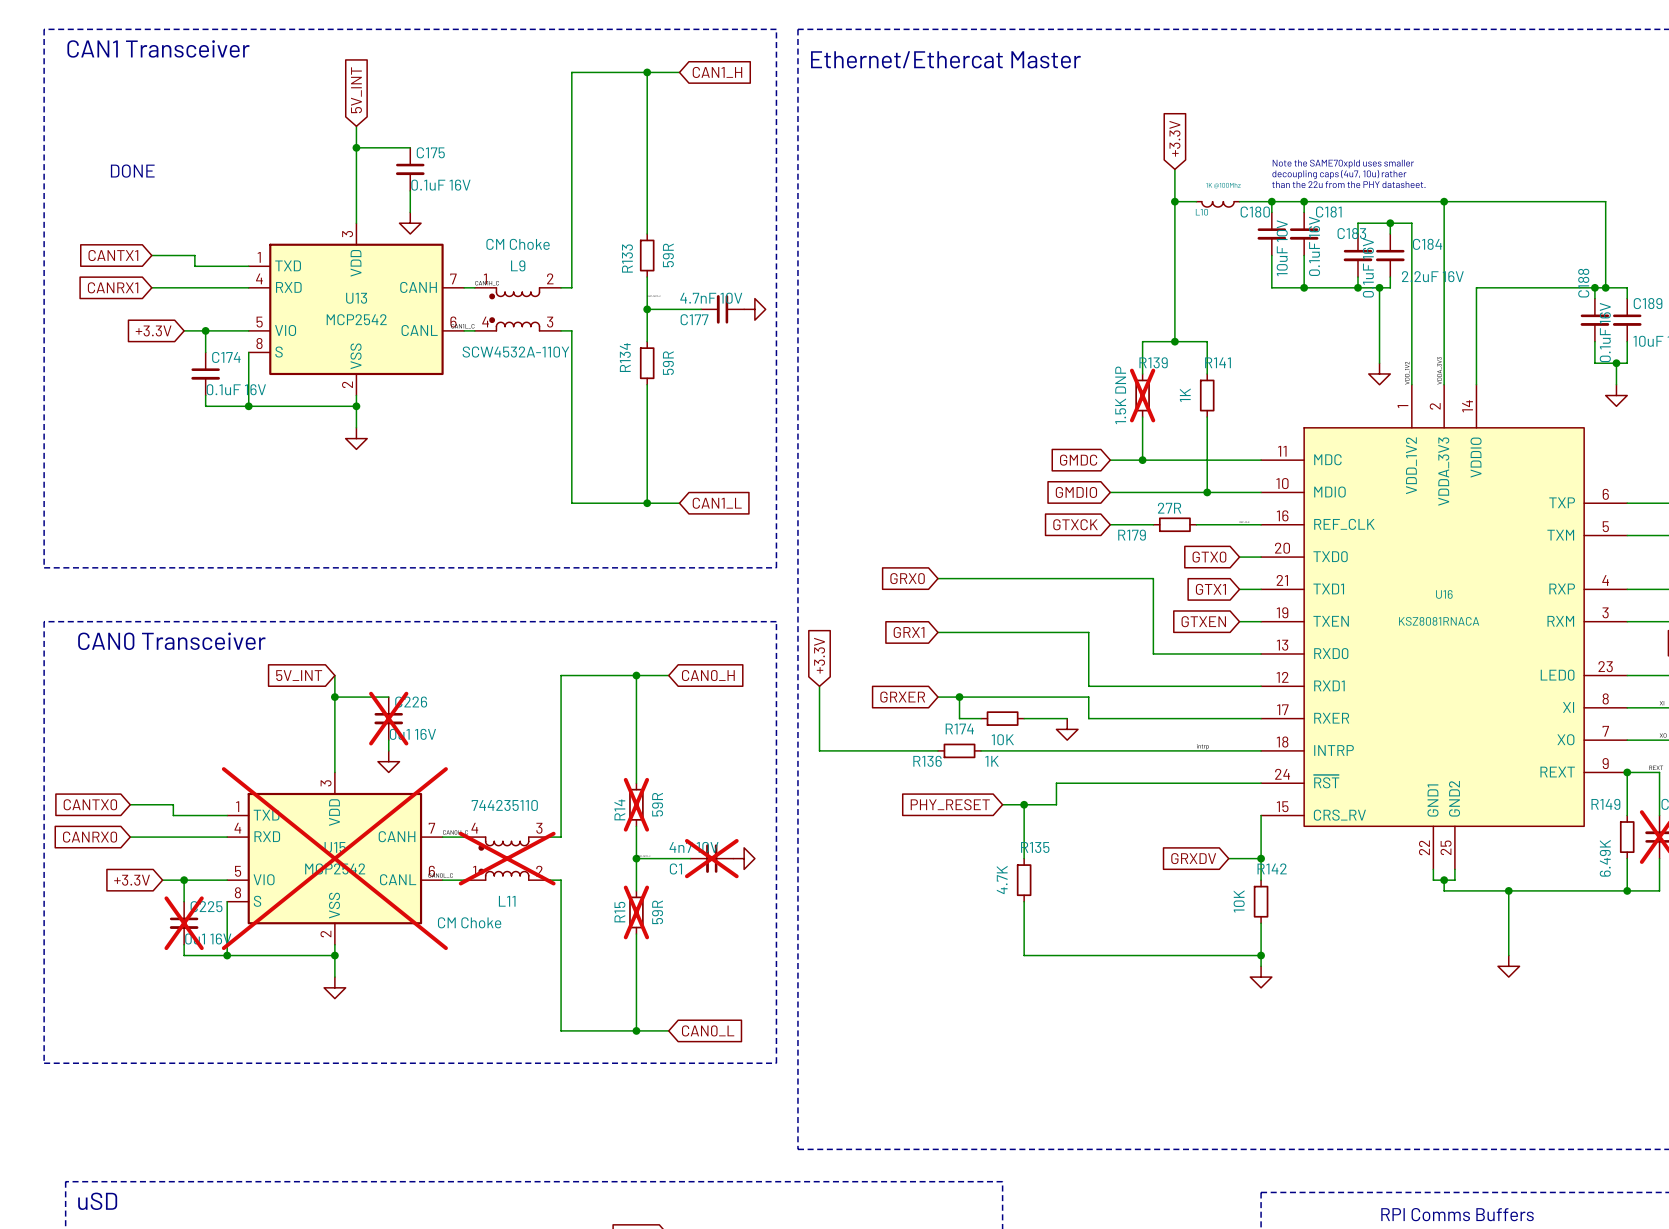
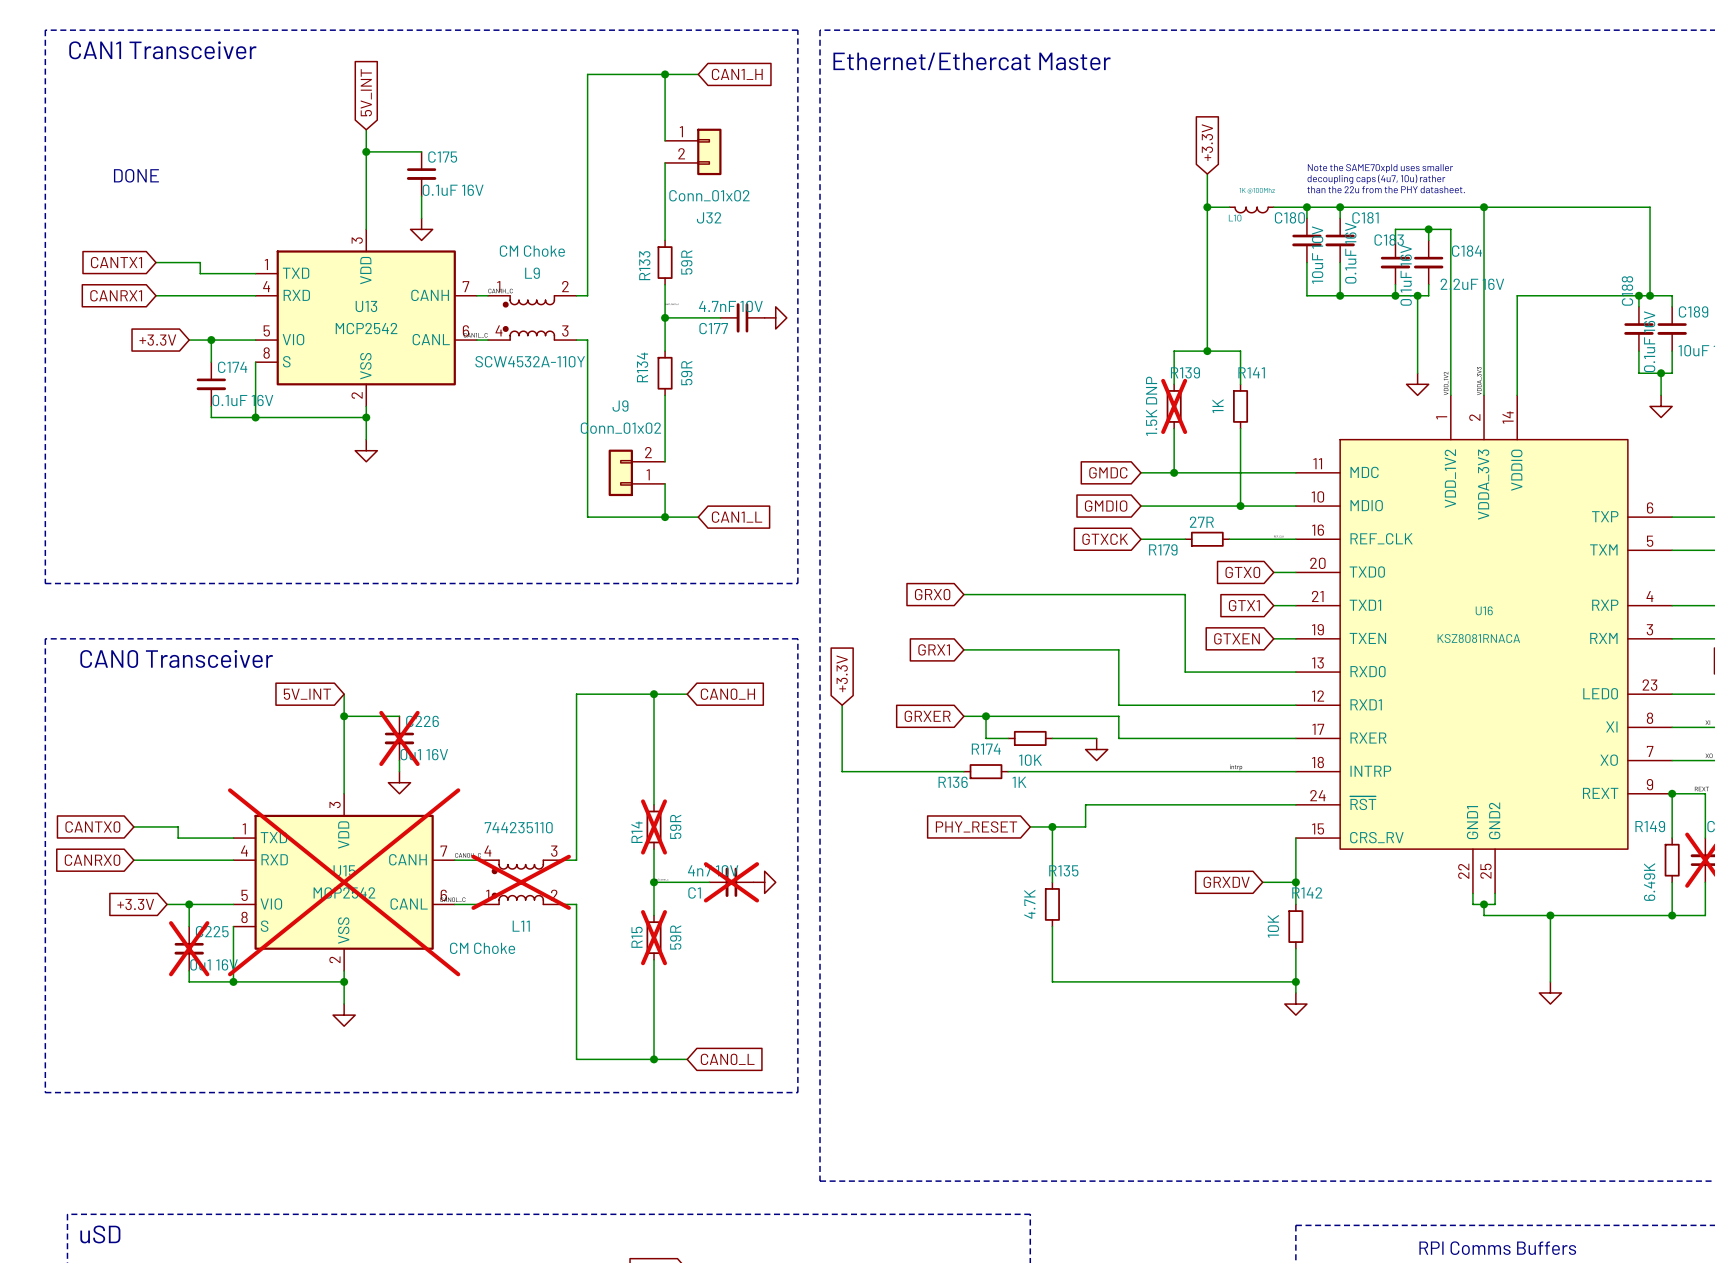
wire: (647, 137) (647, 158) -> none
J32: none -> Conn_01x02 (693, 151)
wire: (647, 449) (647, 470) -> none
J9: none -> Conn_01x02 (636, 472)

